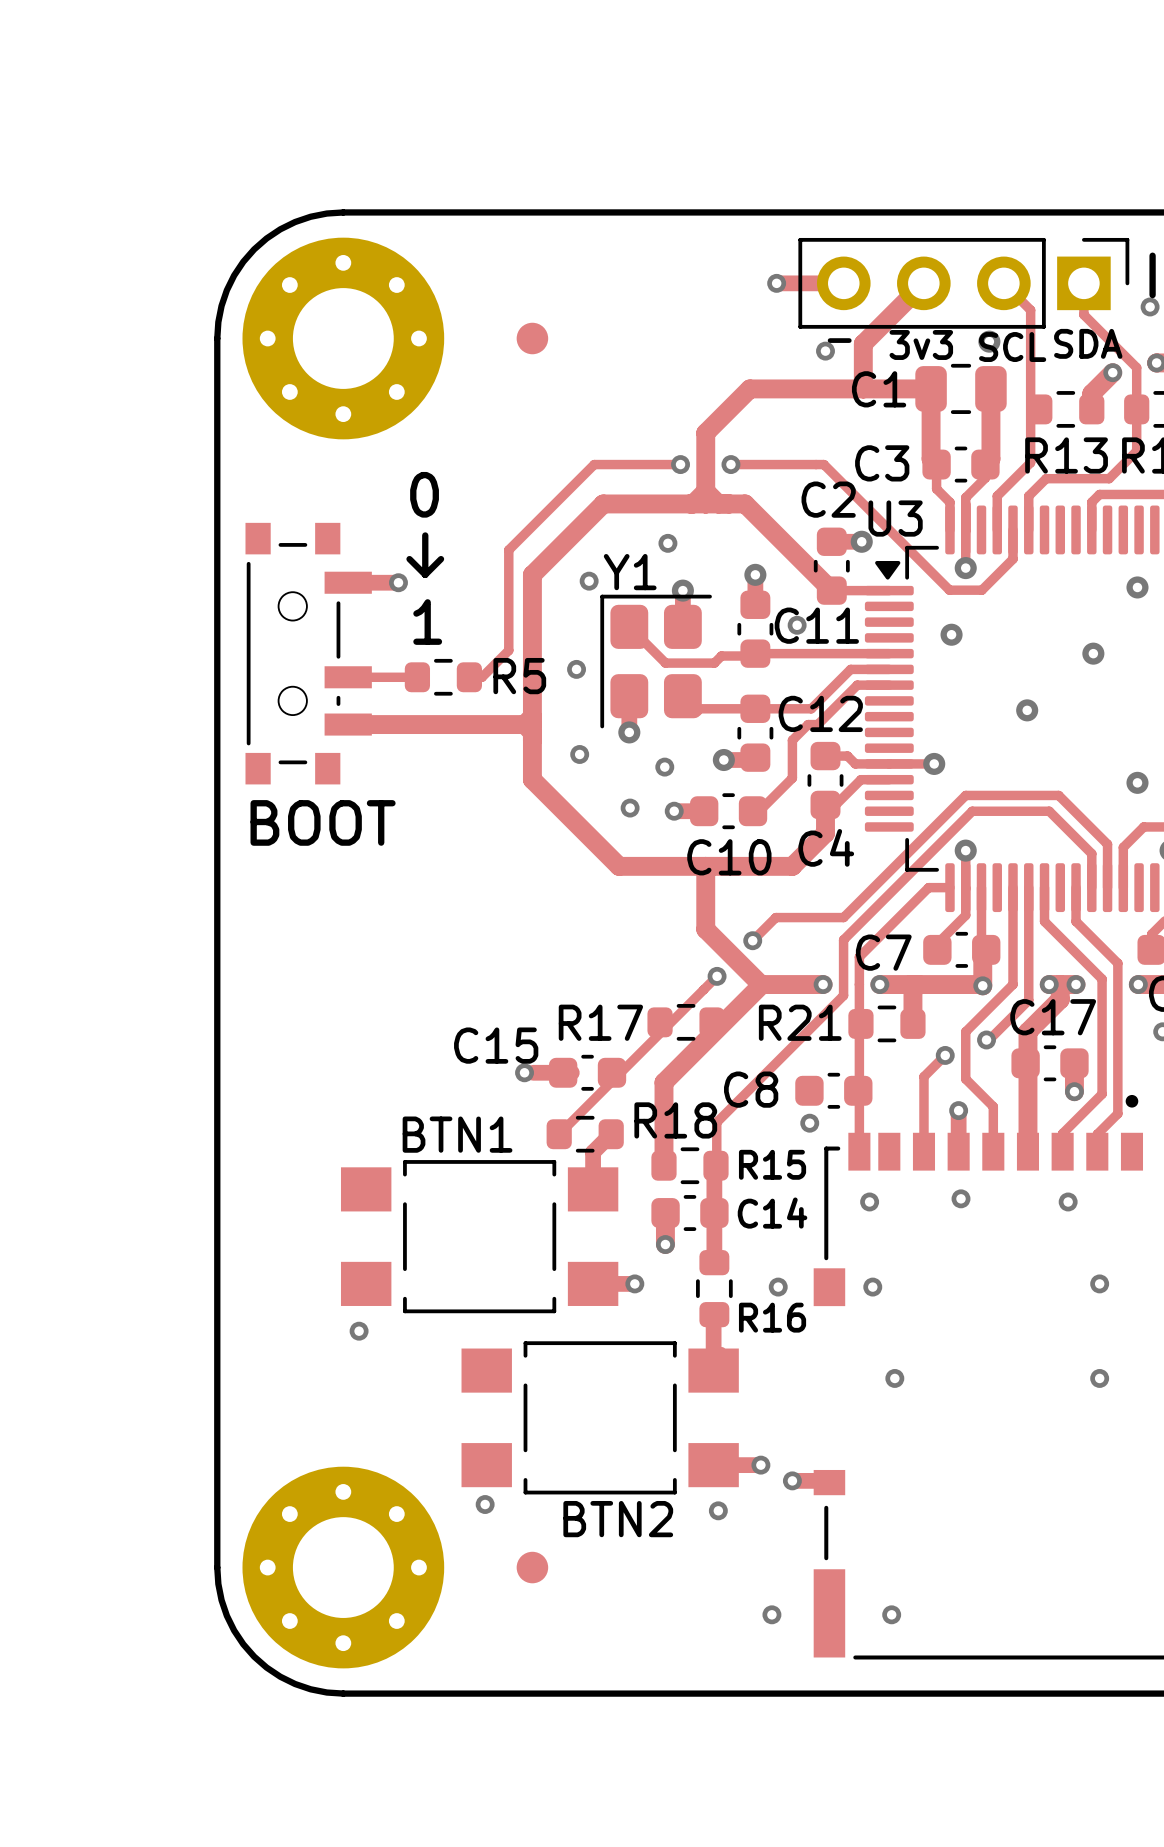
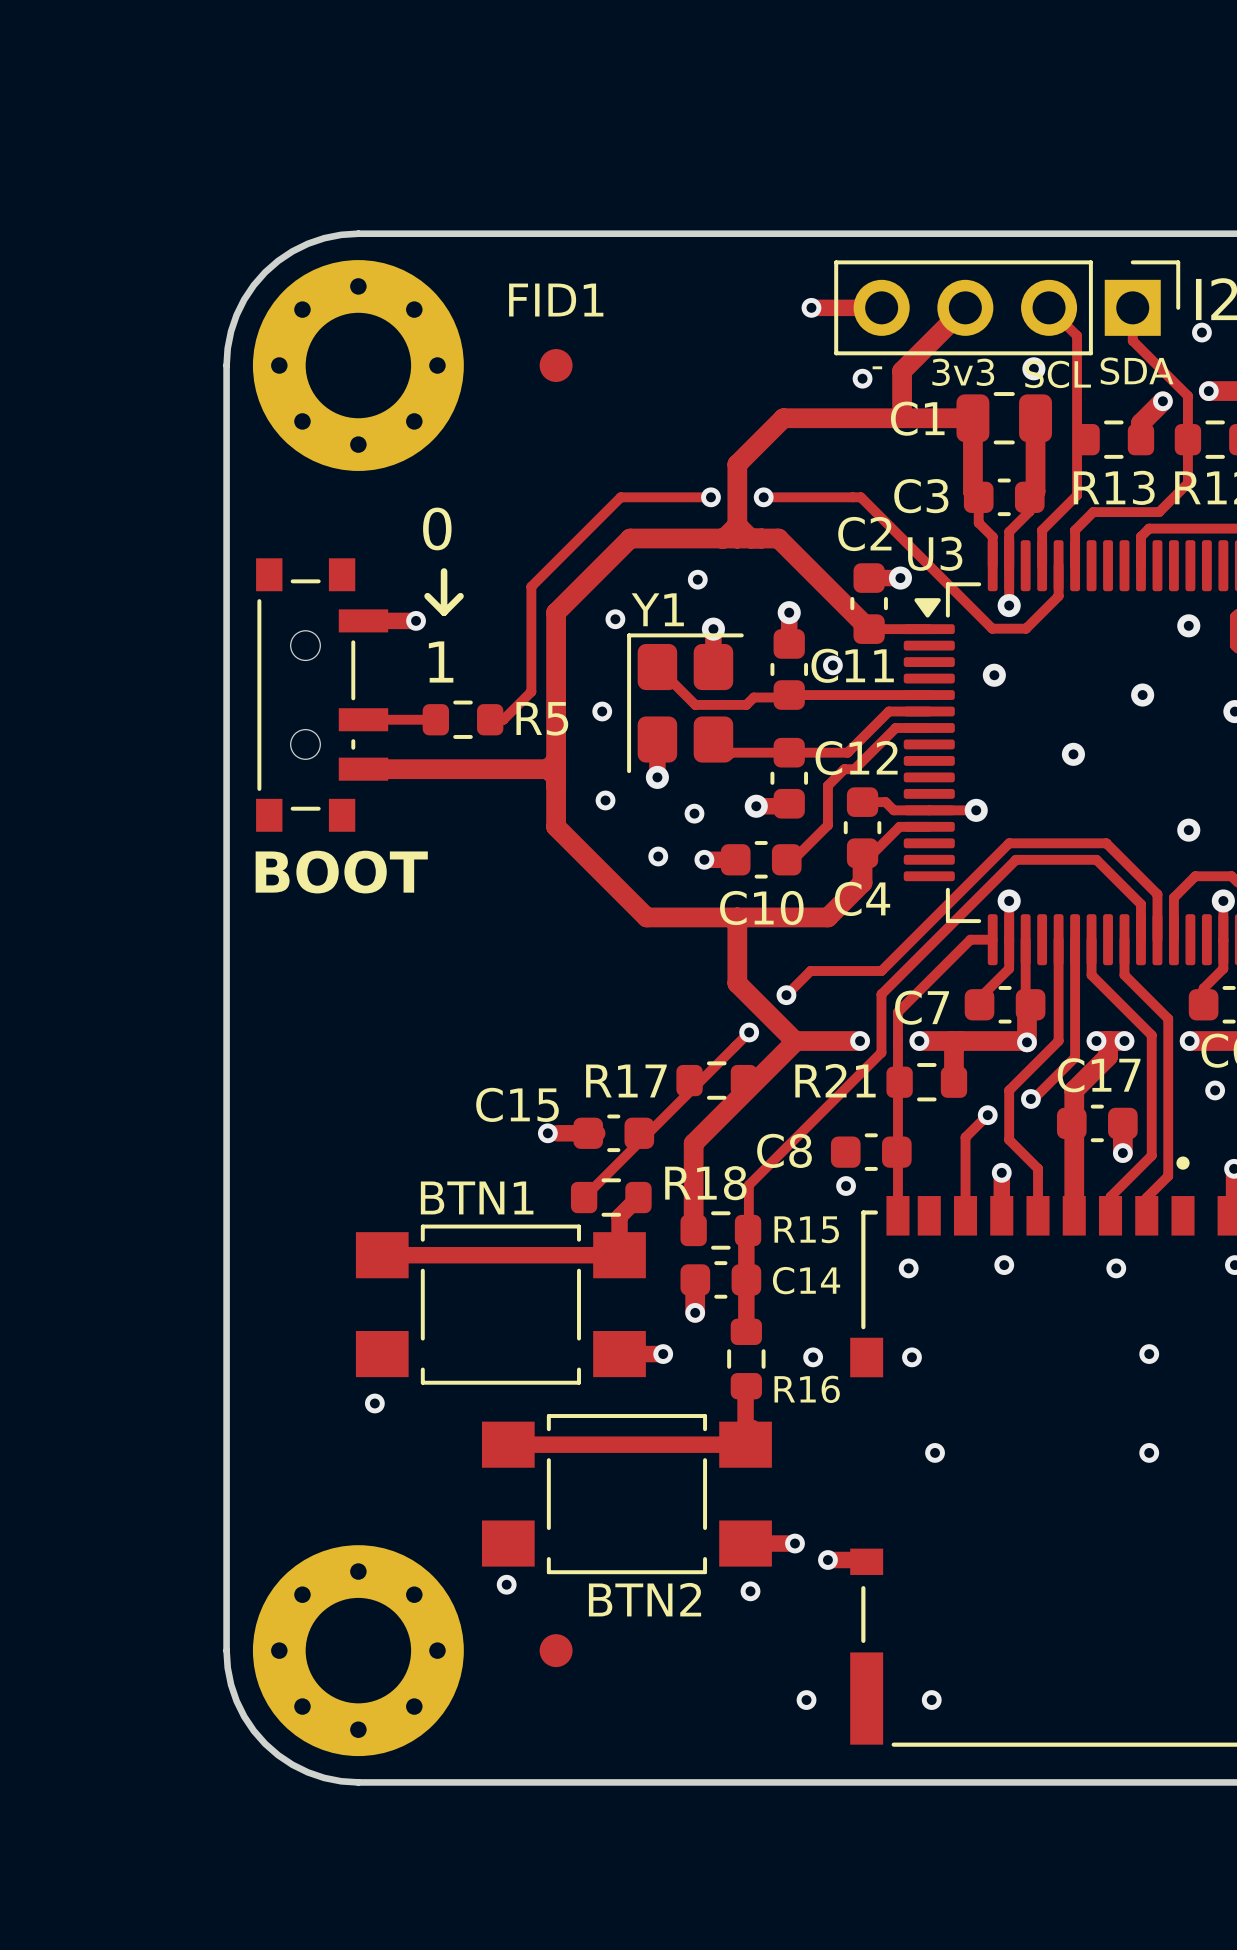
FID1 name: none -> FID1 (556, 300)
track: none -> (382, 1255) (619, 1255)
track: none -> (508, 1444) (745, 1444)

